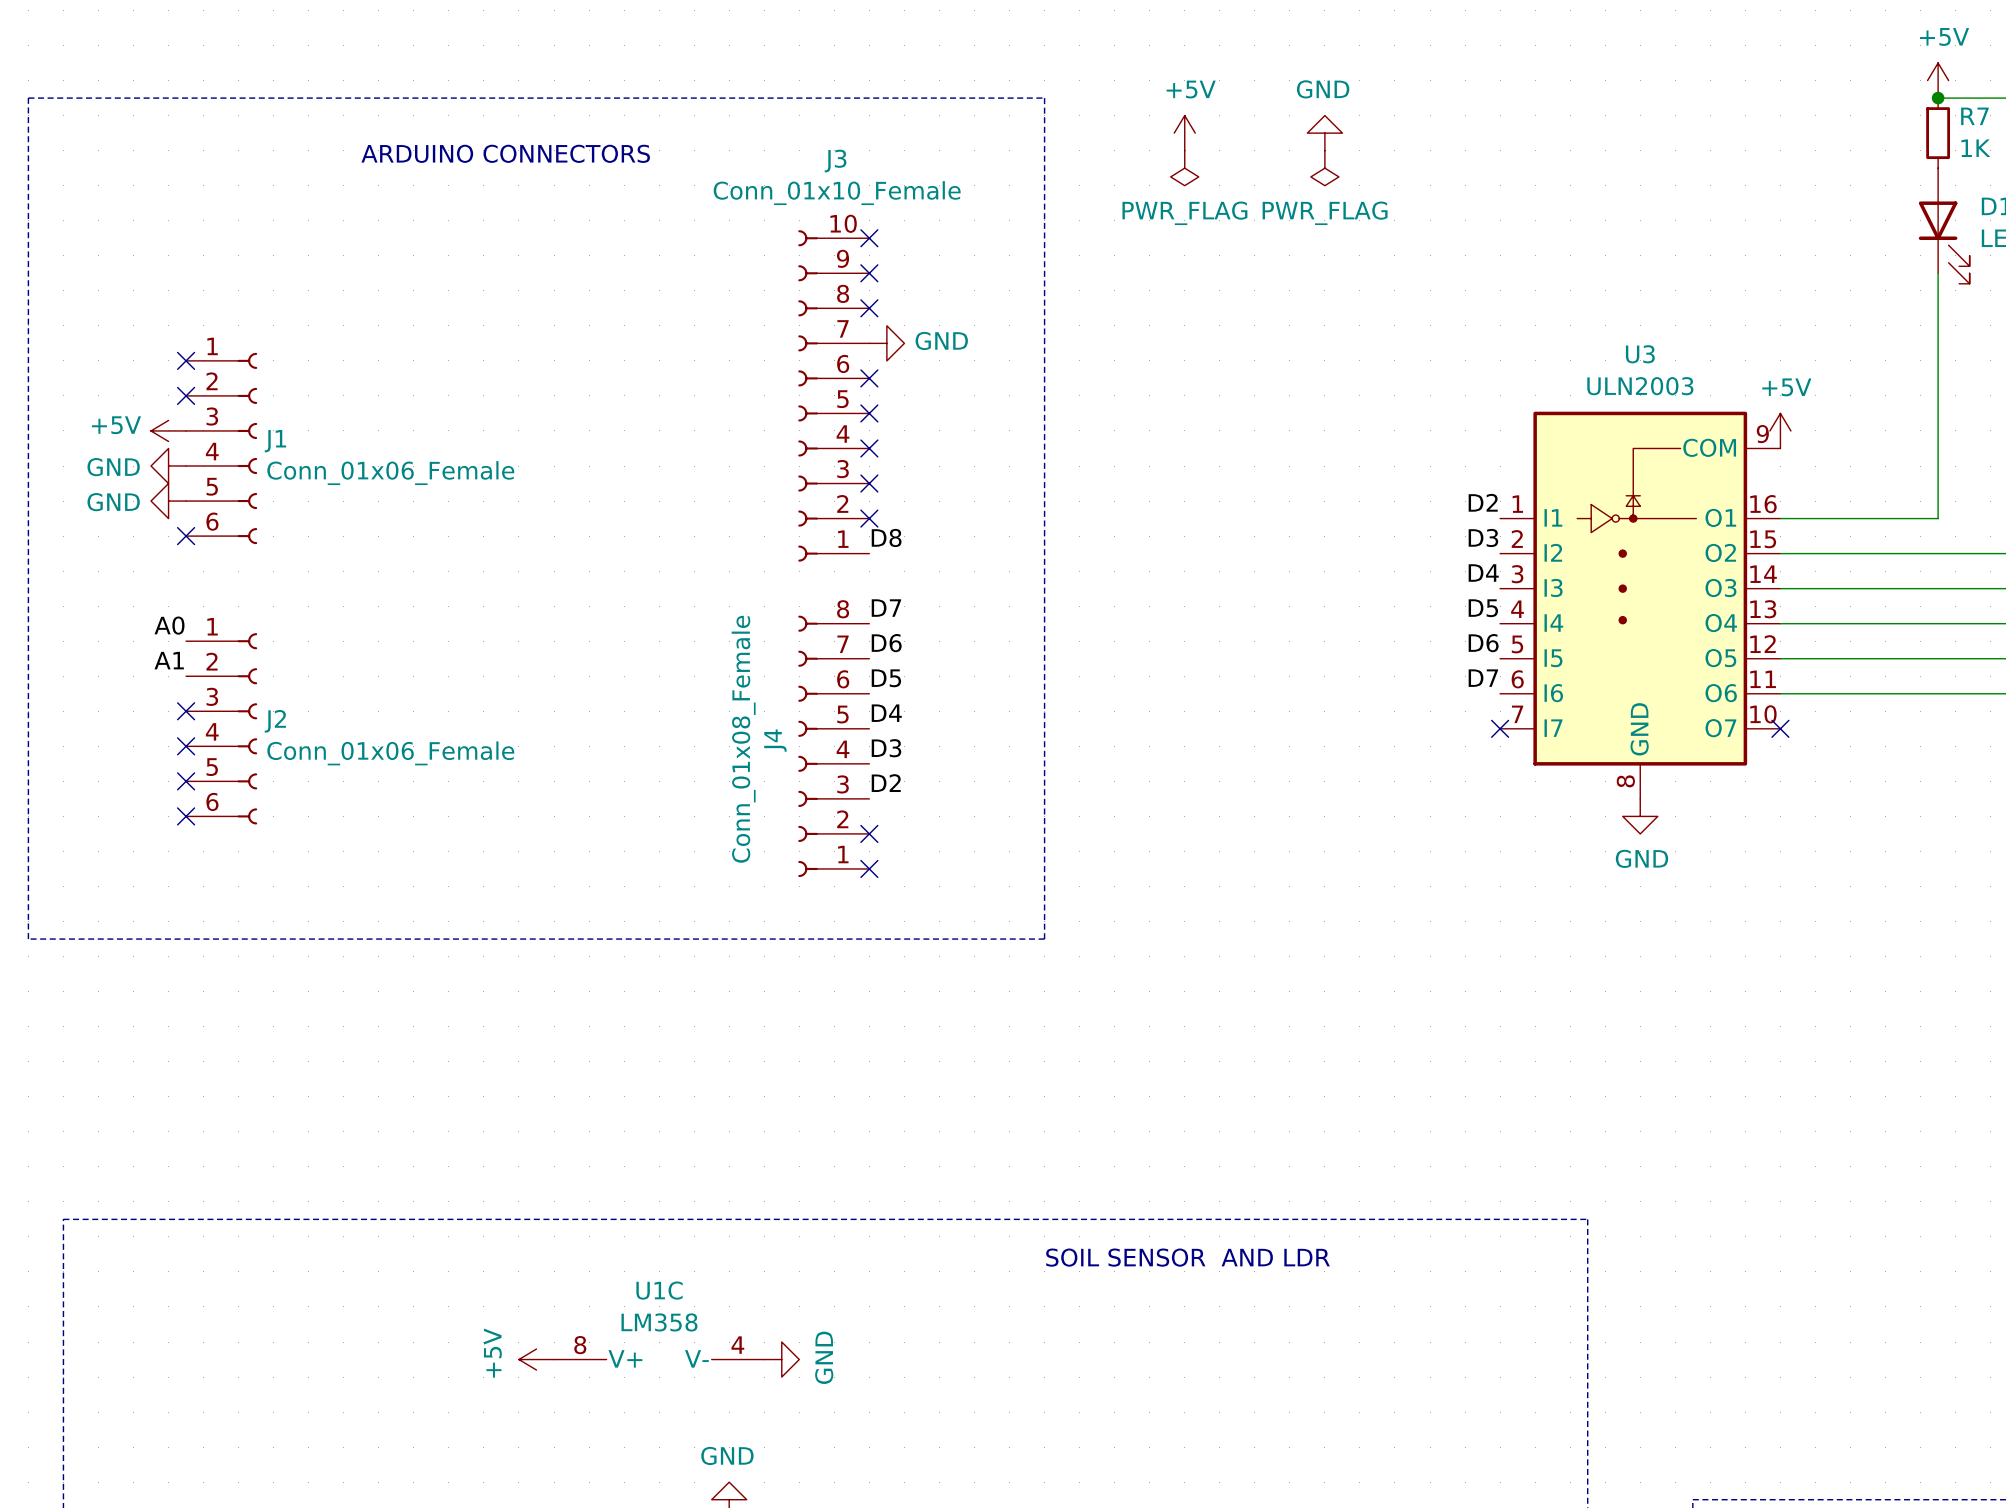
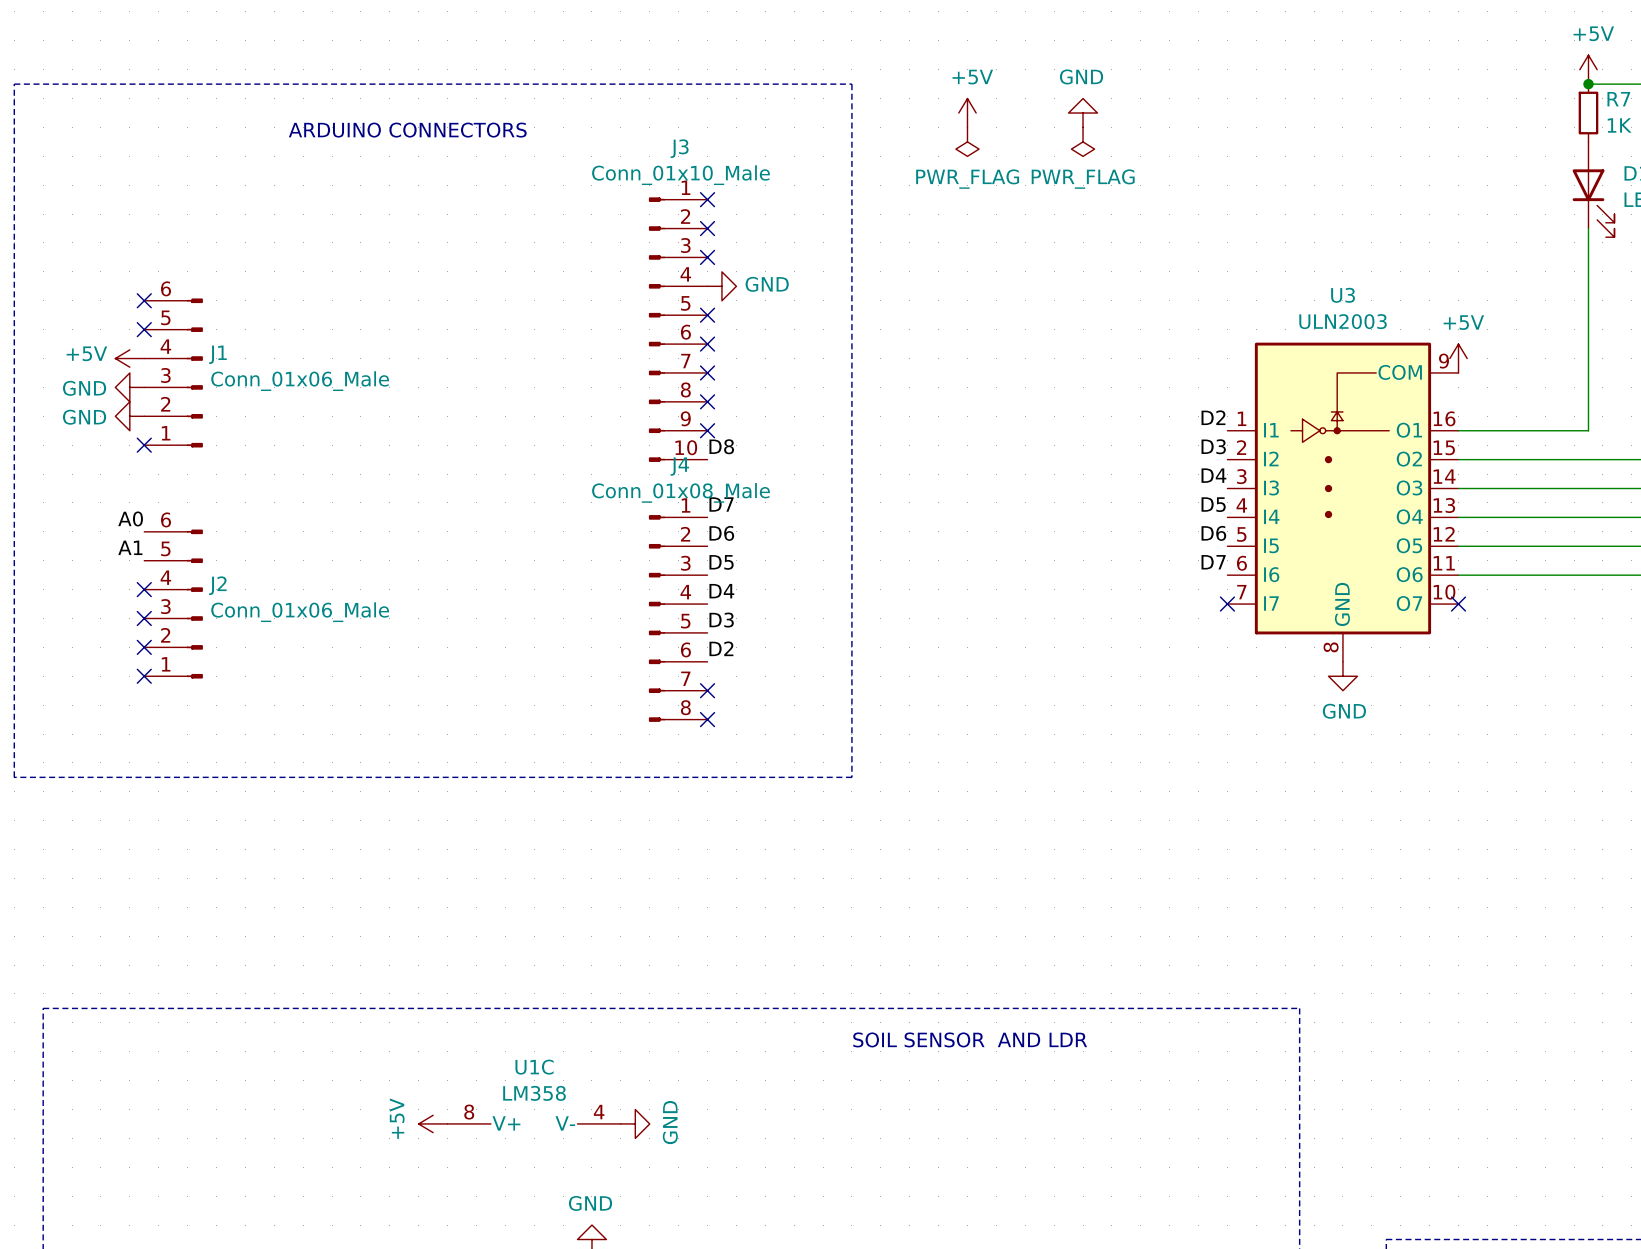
J3 value: Conn_01x10_Female (837, 193) -> Conn_01x10_Male (680, 175)
J3 symbol: [798, 230, 870, 562] -> [648, 197, 708, 462]
J1 symbol: [186, 352, 258, 545] -> [144, 298, 203, 448]
J1 value: Conn_01x06_Female (390, 473) -> Conn_01x06_Male (300, 381)
J4 symbol: [798, 615, 870, 878] -> [648, 515, 708, 722]
J2 symbol: [186, 633, 258, 825] -> [144, 529, 203, 679]
J4 value: Conn_01x08_Female (743, 739) -> Conn_01x08_Male (680, 492)
J4 name position: J4 (775, 740) -> J4 (679, 466)
J2 value: Conn_01x06_Female (390, 753) -> Conn_01x06_Male (300, 612)

